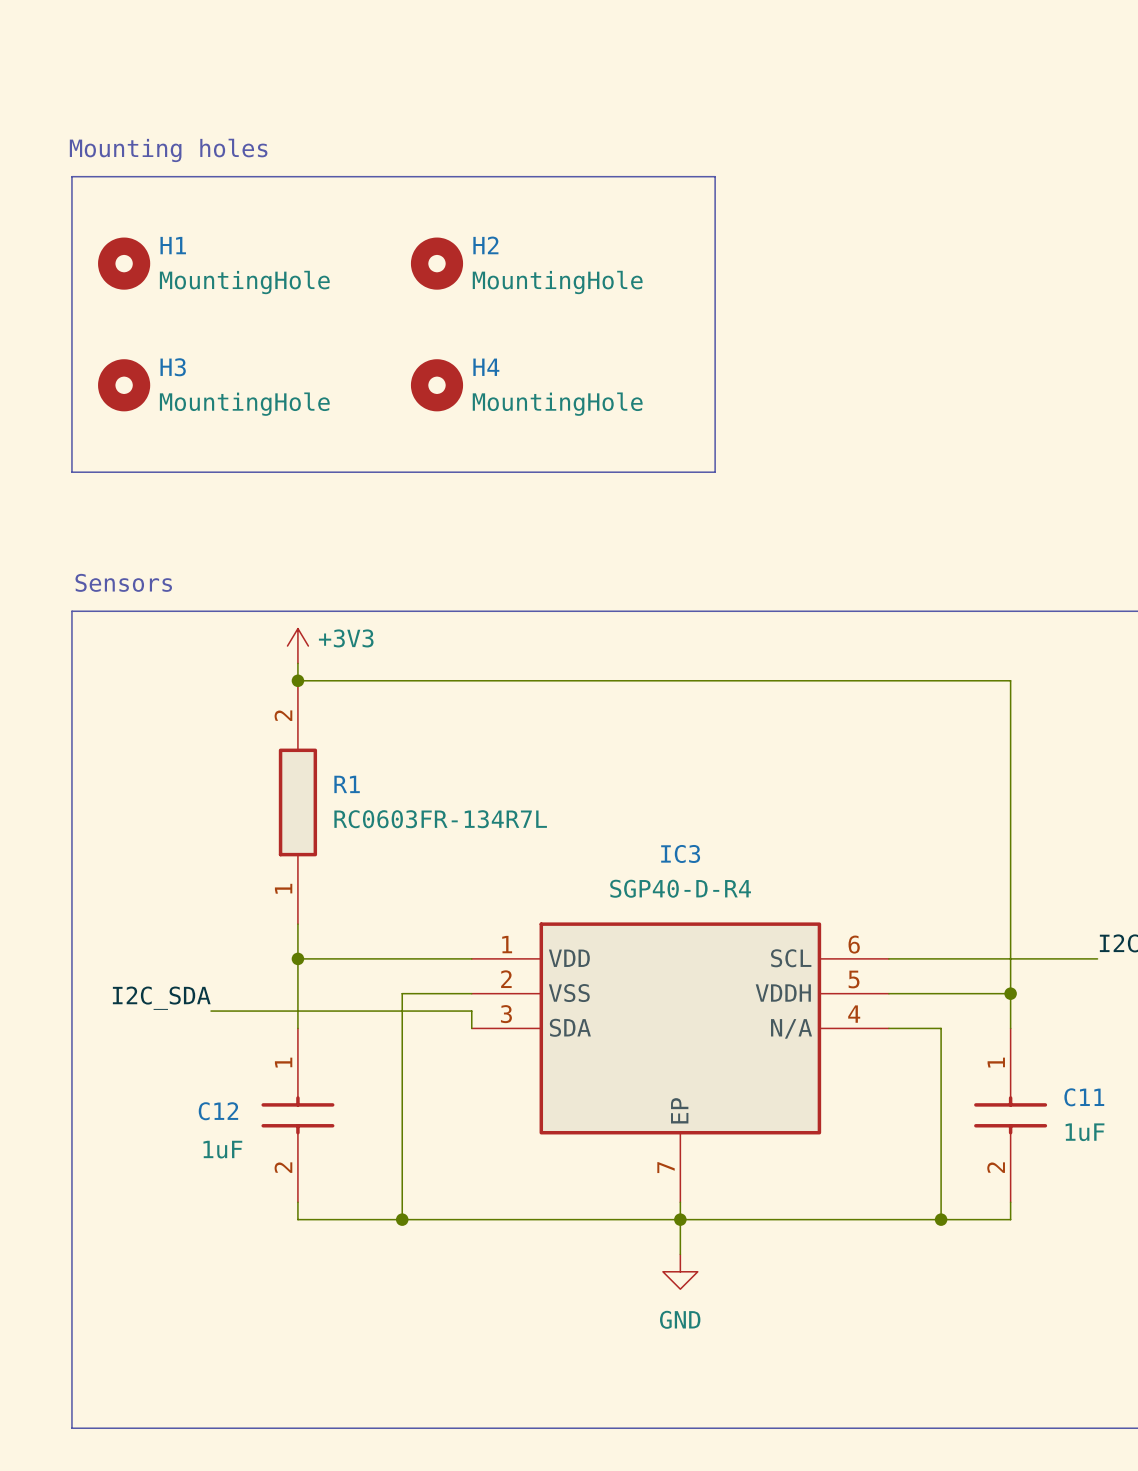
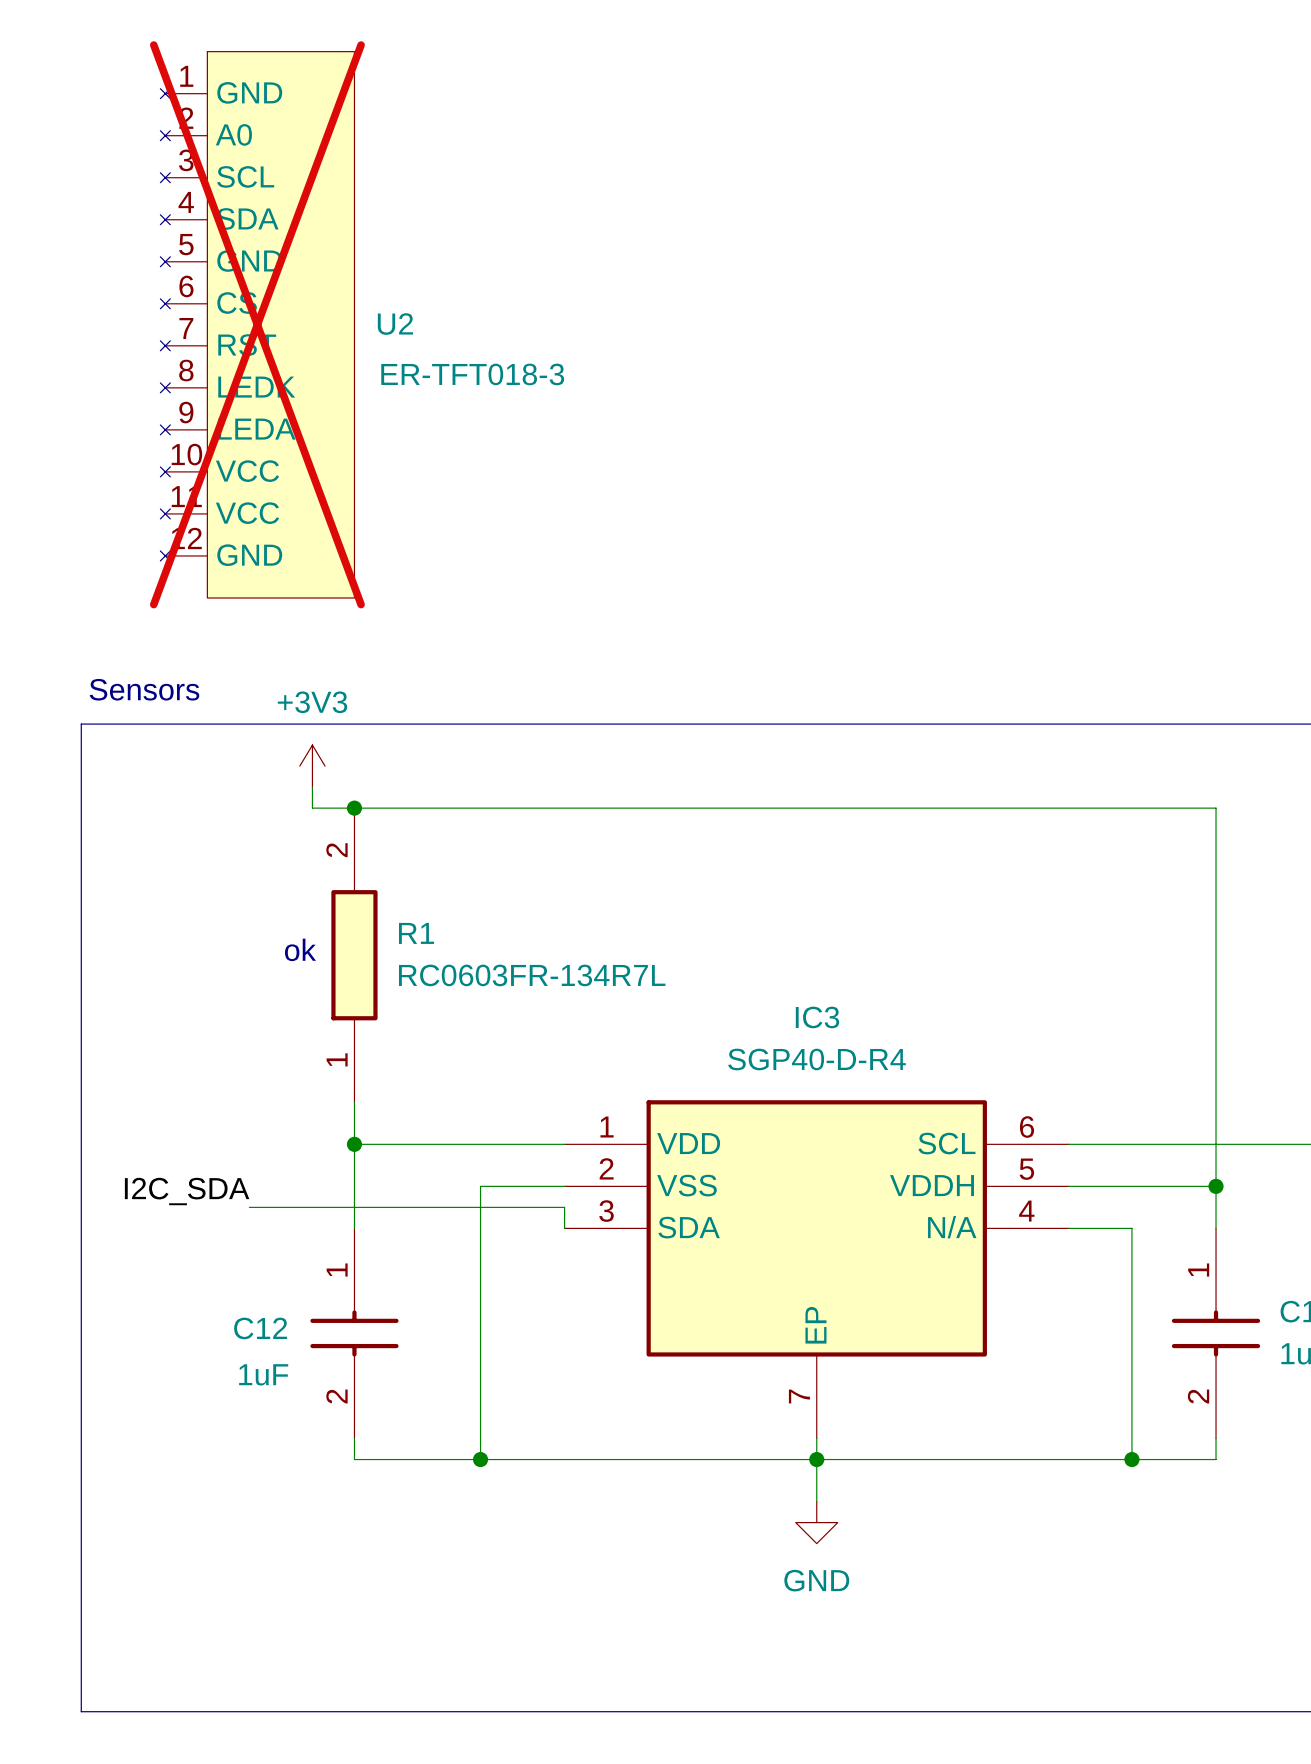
text: Mounting holes (168, 150) -> none
line: (71, 176) (715, 176) (715, 472) (71, 472) (71, 176) -> none
H1: MountingHole (124, 263) -> none
H2: MountingHole (437, 263) -> none
U2: none -> ER-TFT018-3 (257, 324)
H3: MountingHole (124, 385) -> none
H4: MountingHole (437, 385) -> none
power symbol text position: +3V3 (346, 638) -> +3V3 (312, 702)
power symbol position: +3V3 (297, 646) -> +3V3 (312, 766)
wire: (297, 663) (297, 680) -> (312, 787) (312, 808) (354, 808)
text: none -> ok (300, 949)

